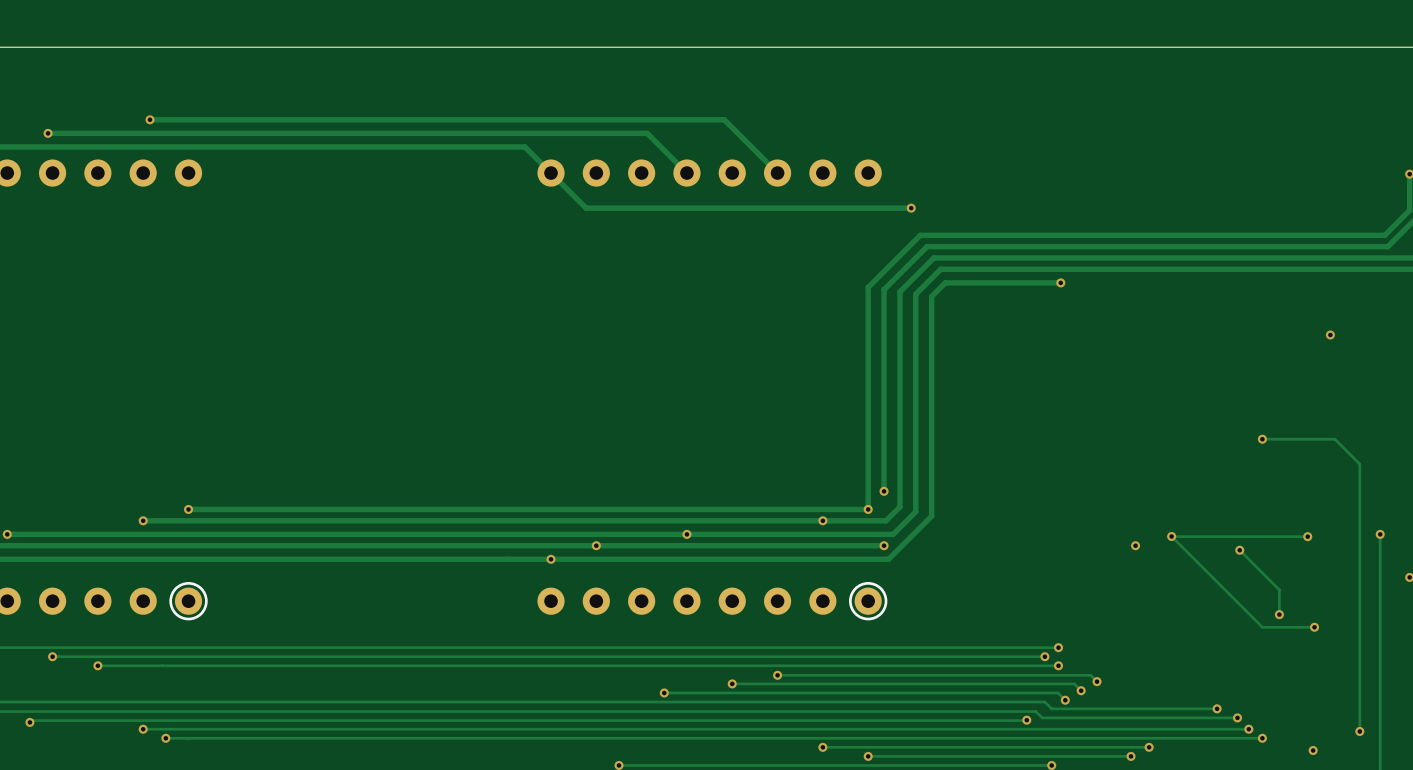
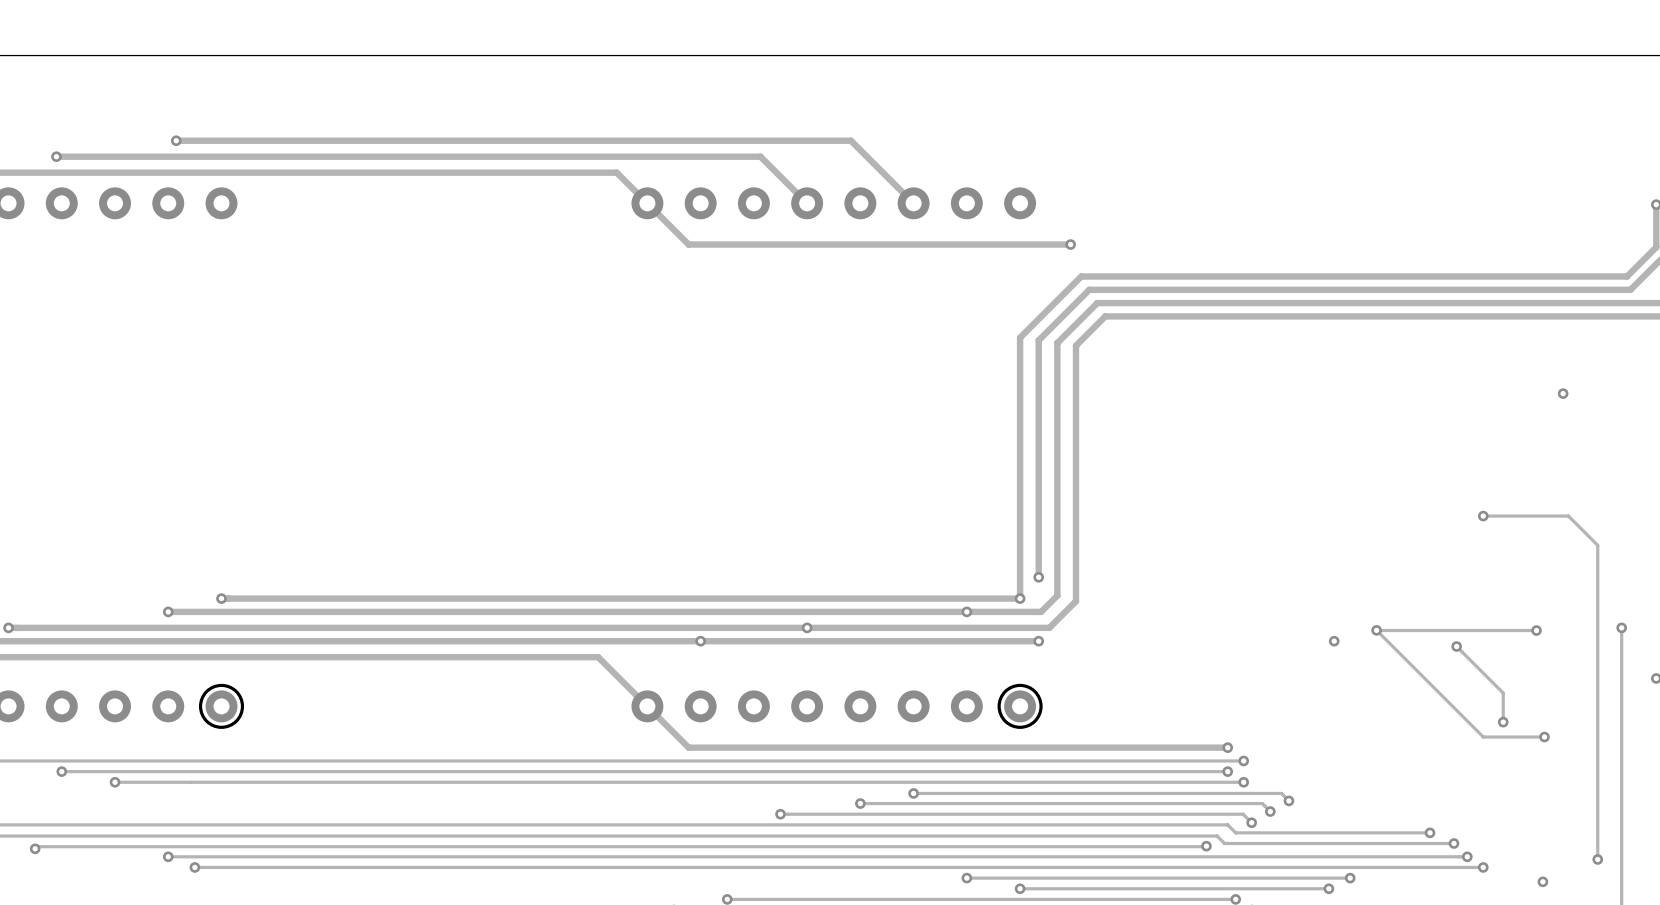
track: (1060, 282) (945, 282) (931, 296) (931, 516) (888, 559) (509, 559) -> (1227, 747) (688, 747) (598, 657)
via: (1060, 282) -> none
via: (551, 559) -> none
via: none -> (1227, 747)

